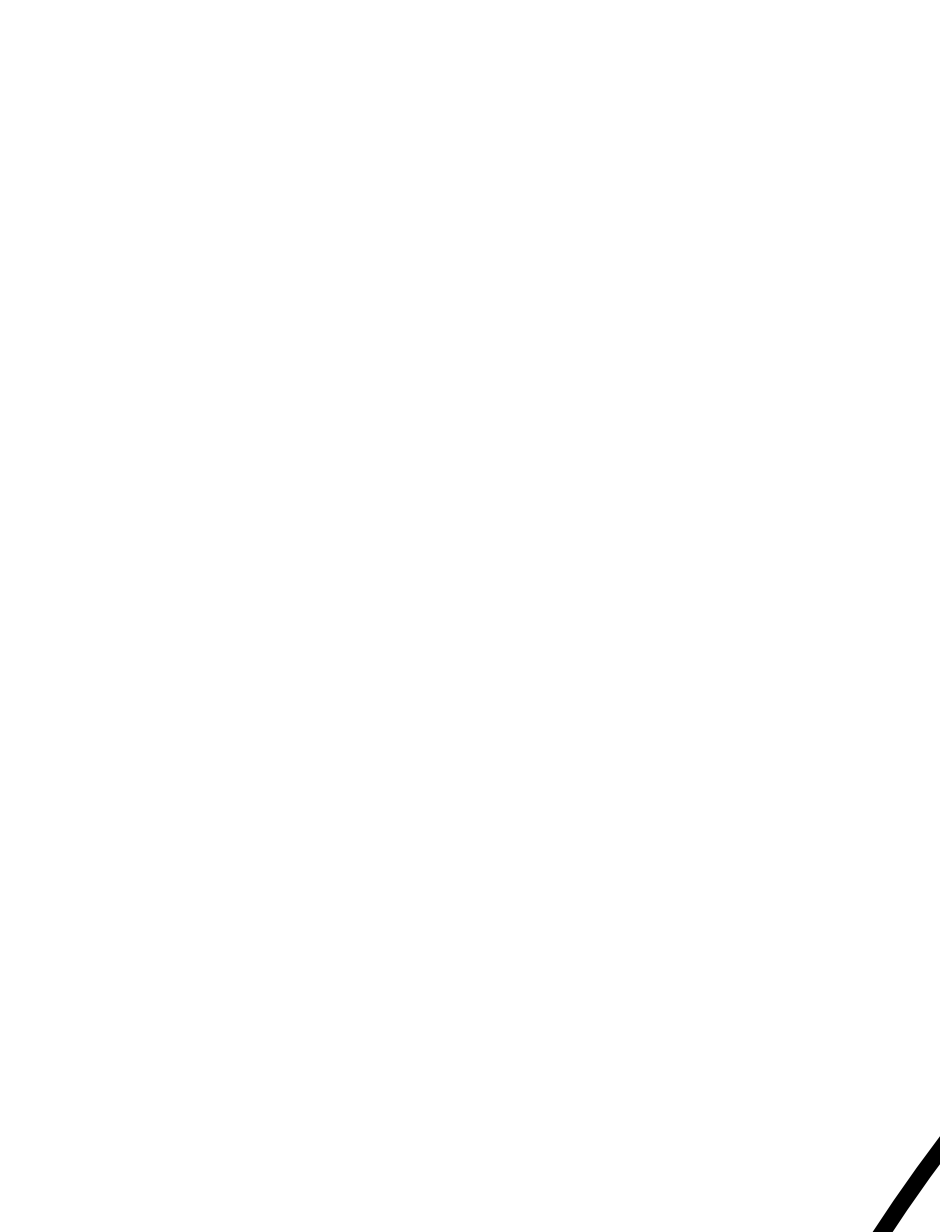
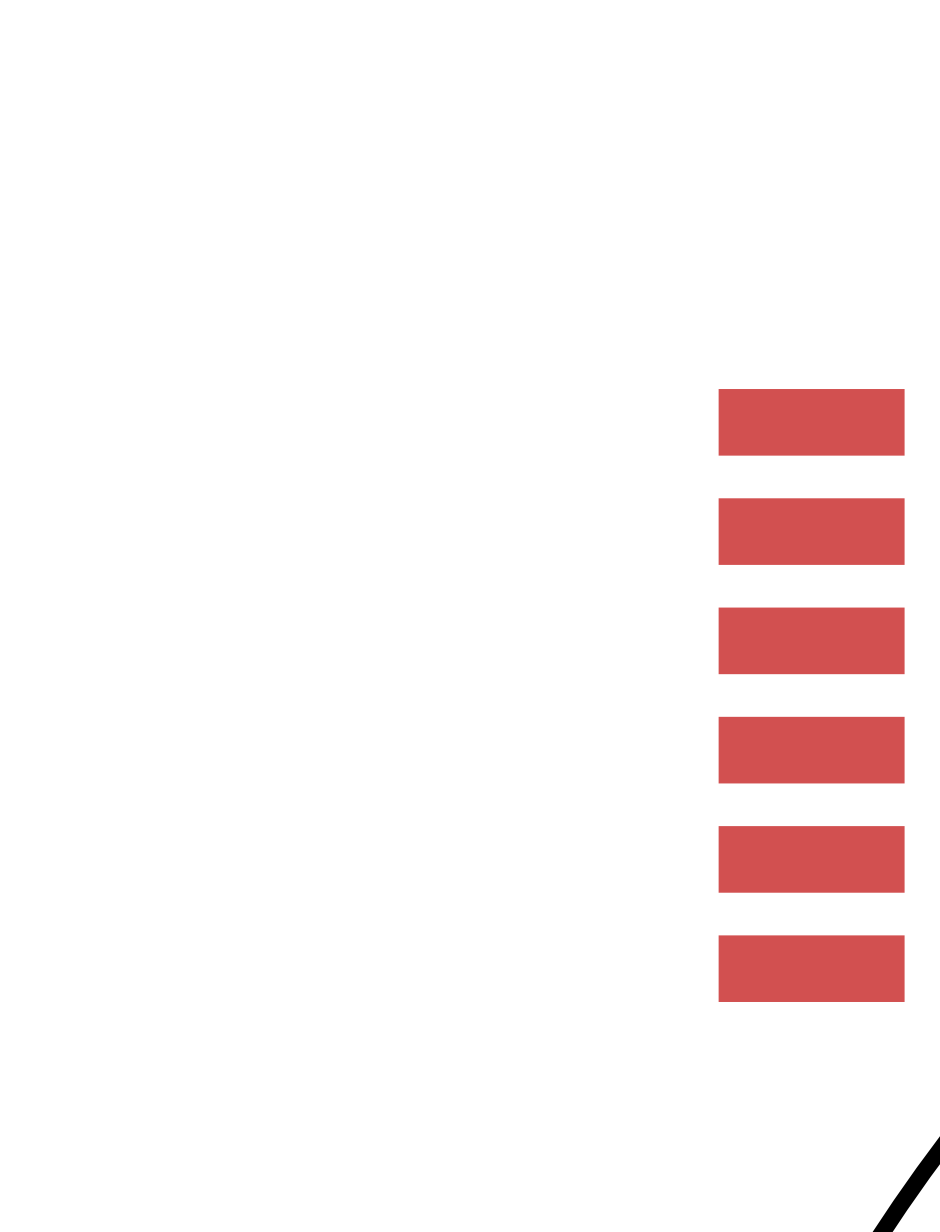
part: none -> (811, 695)

